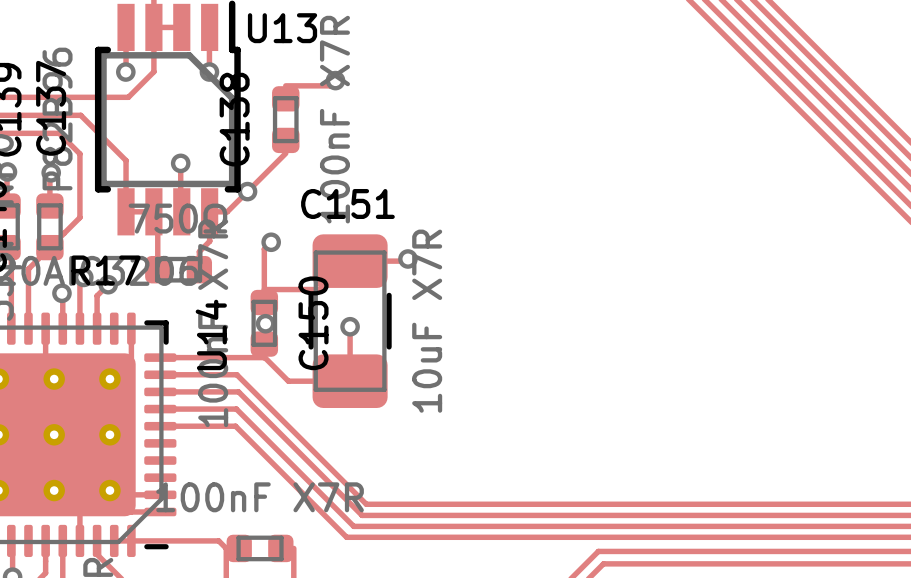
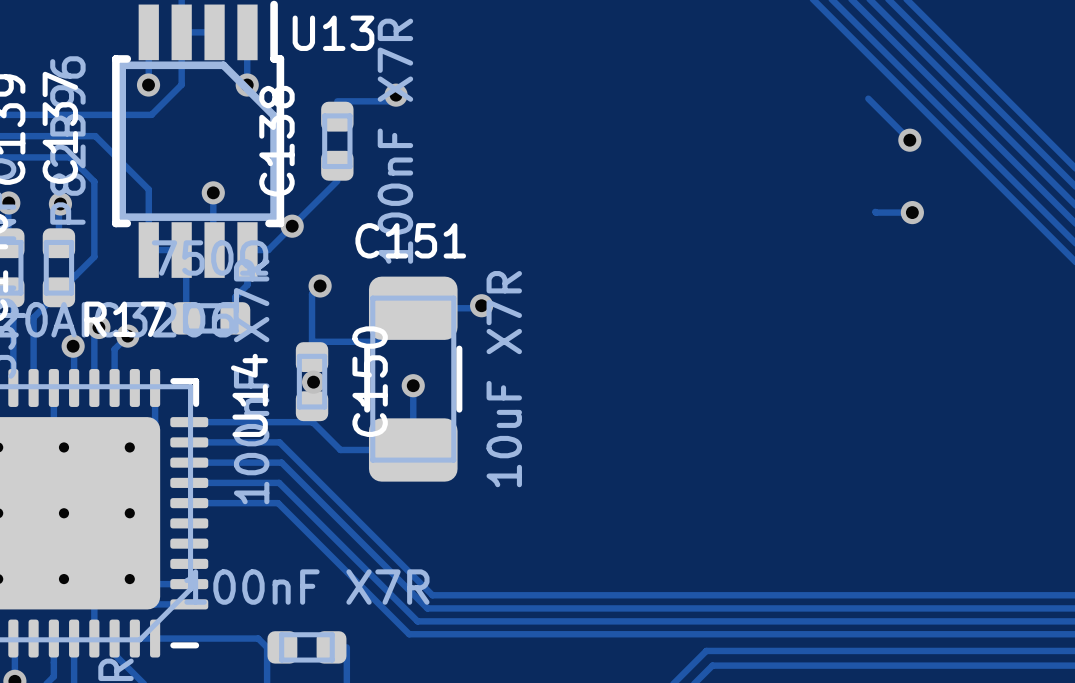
track: none -> (868, 98) (909, 140)
via: none -> (909, 140)
track: none -> (875, 212) (912, 212)
via: none -> (912, 212)

